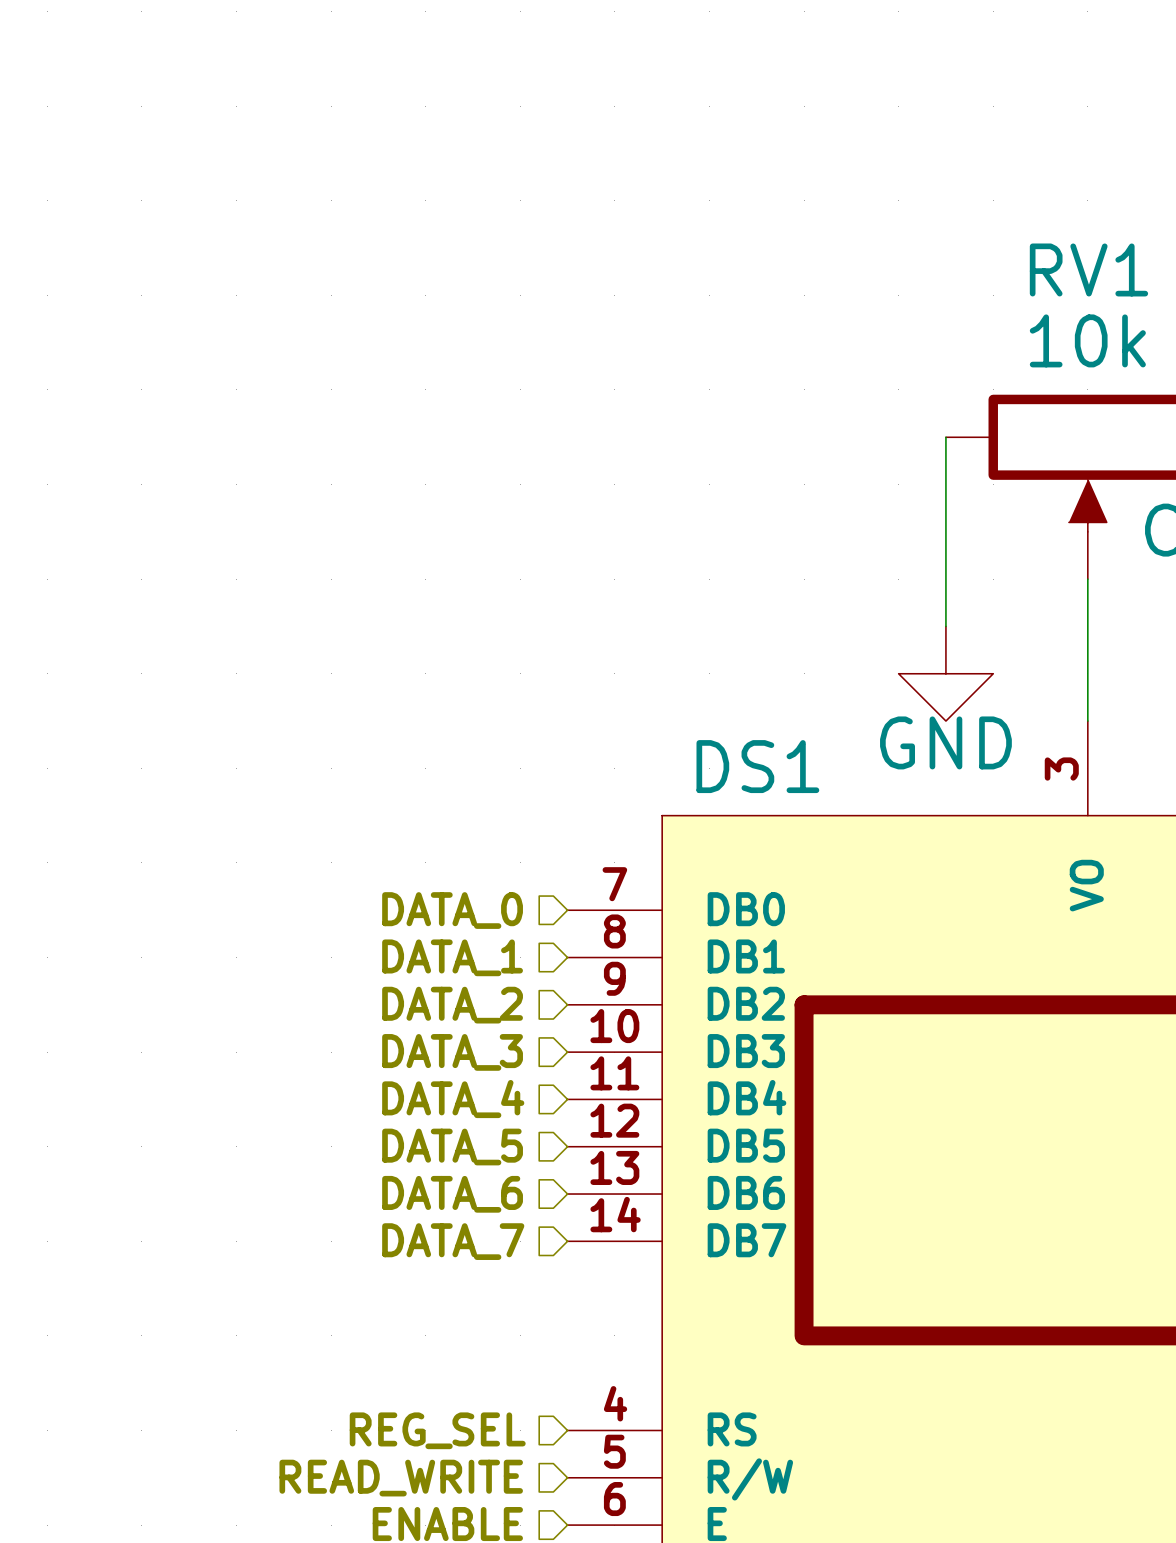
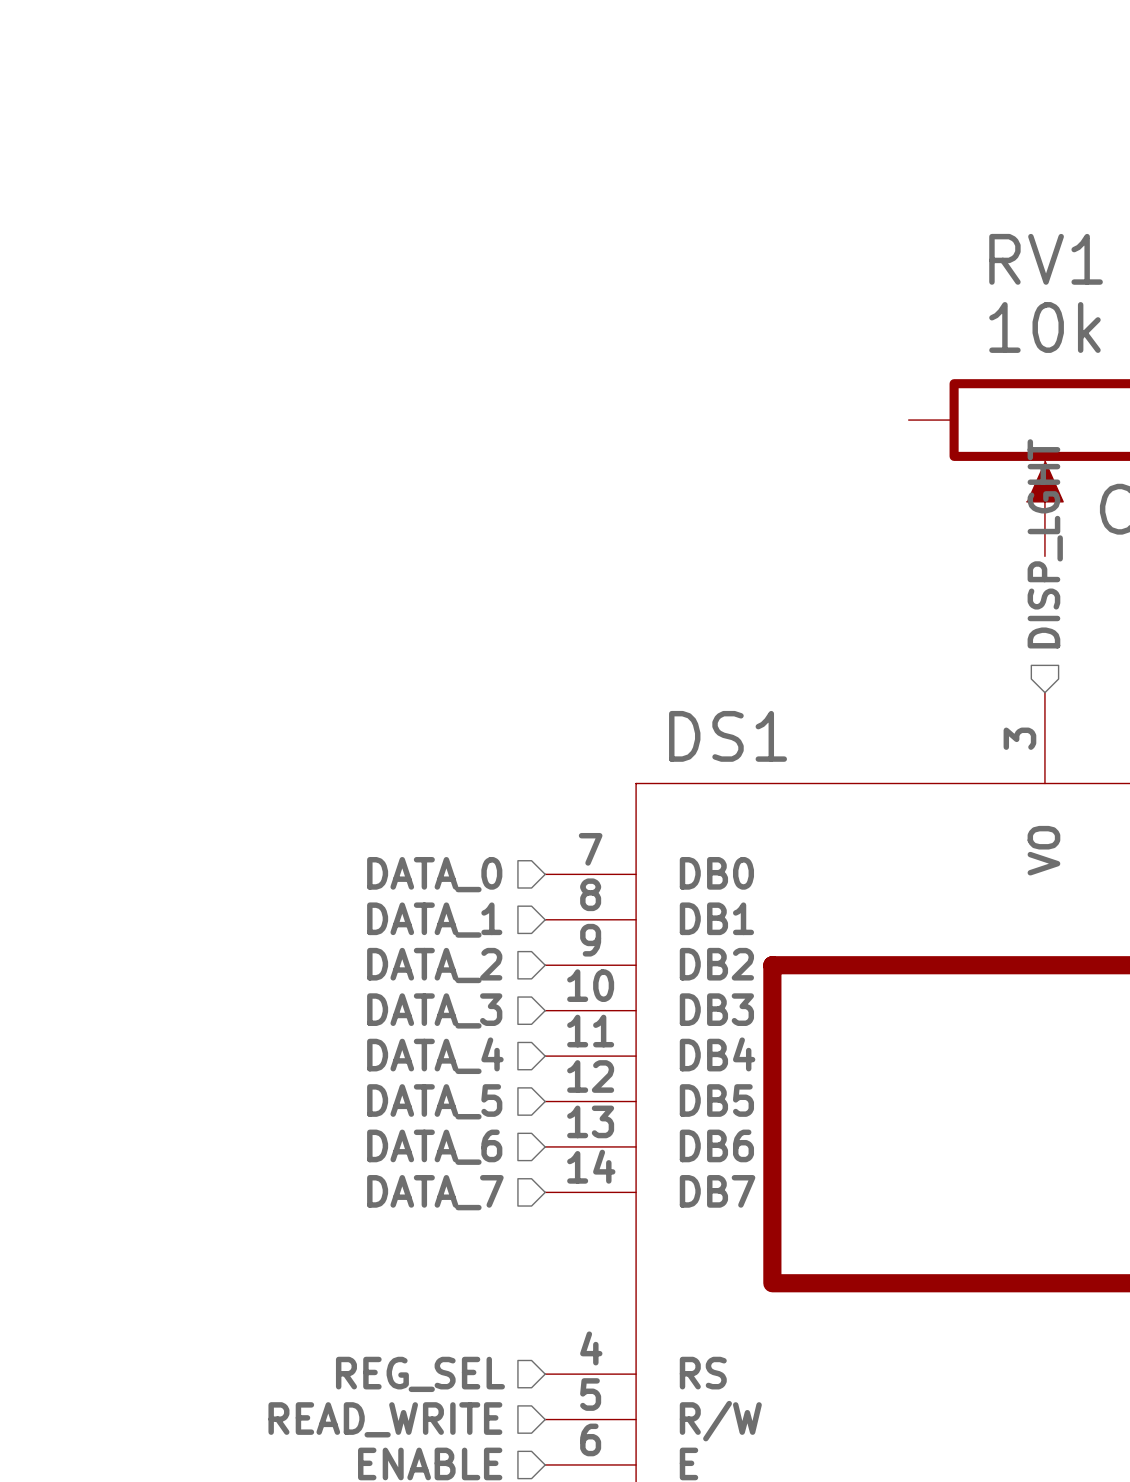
wire: (945, 437) (945, 626) -> none
hierarchical label: none -> DISP_LGHT (1045, 543)
wire: (1087, 579) (1087, 721) -> none
power symbol: GND (945, 673) -> none

